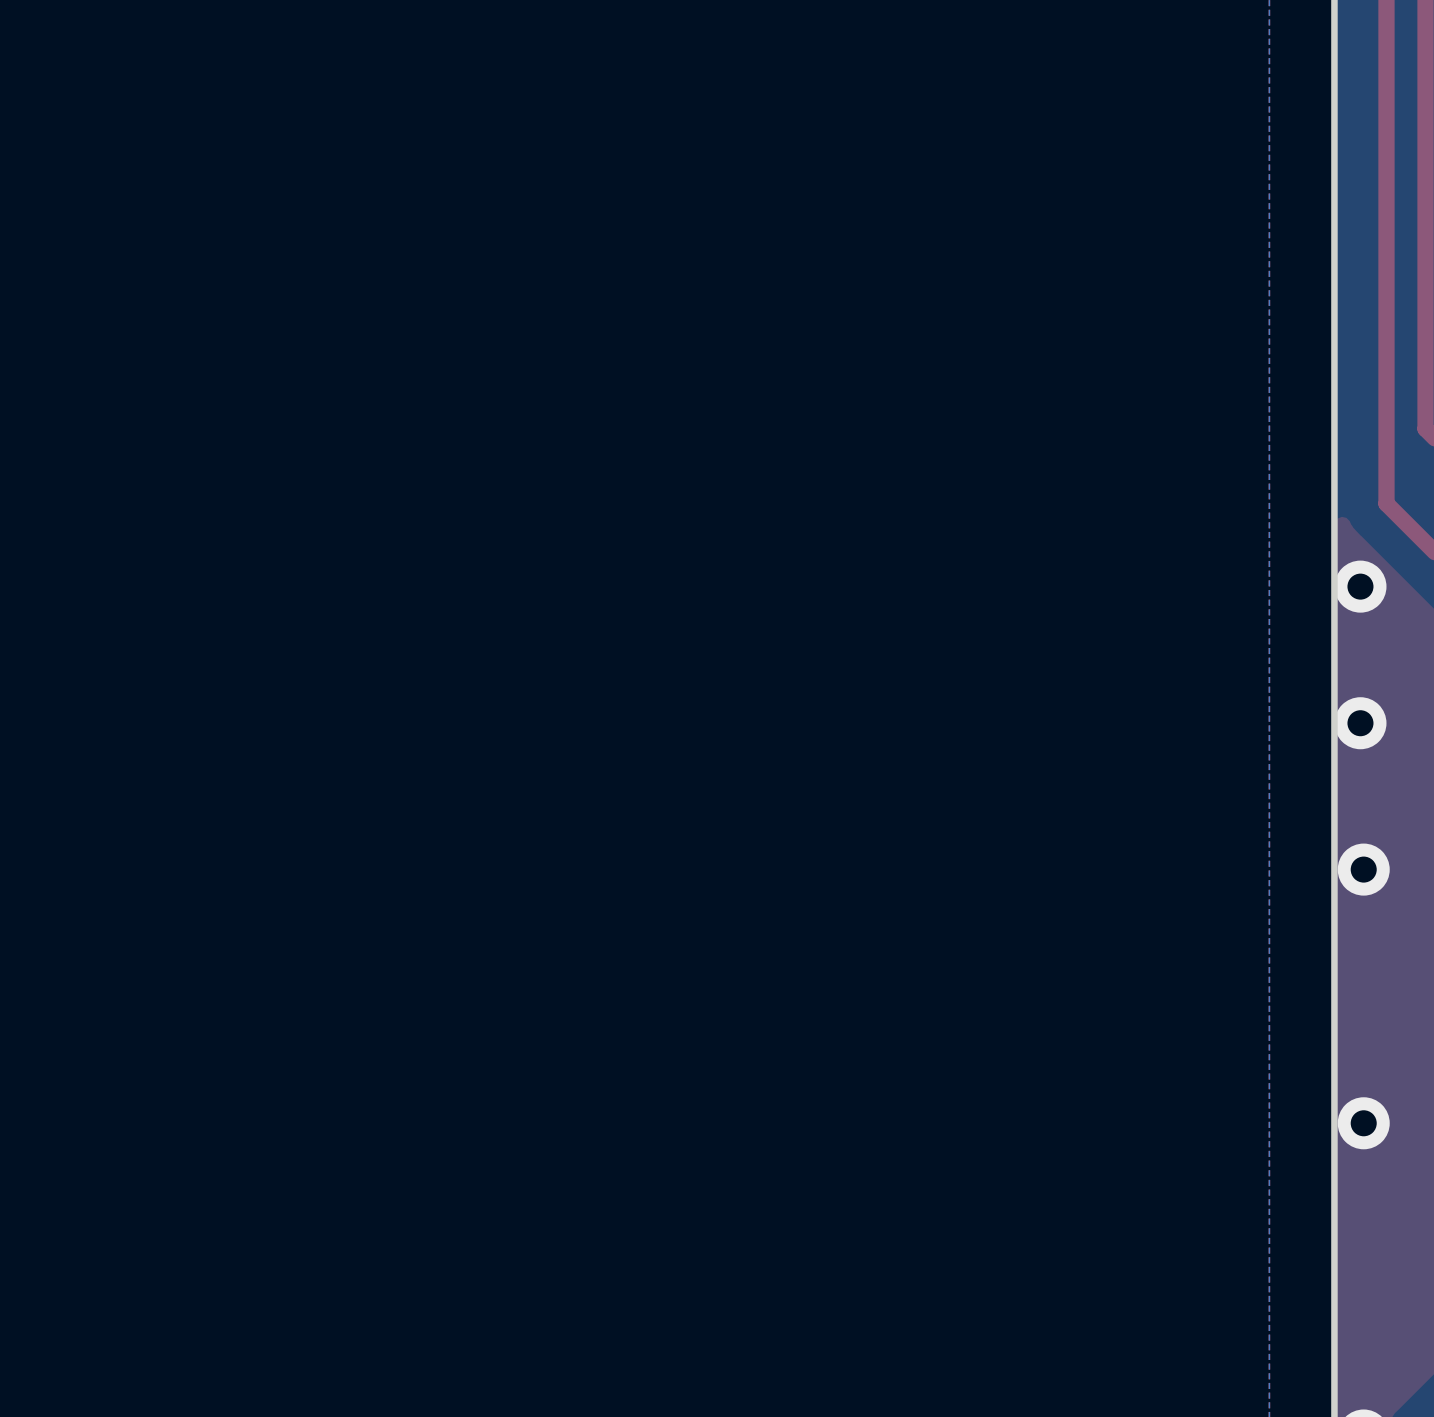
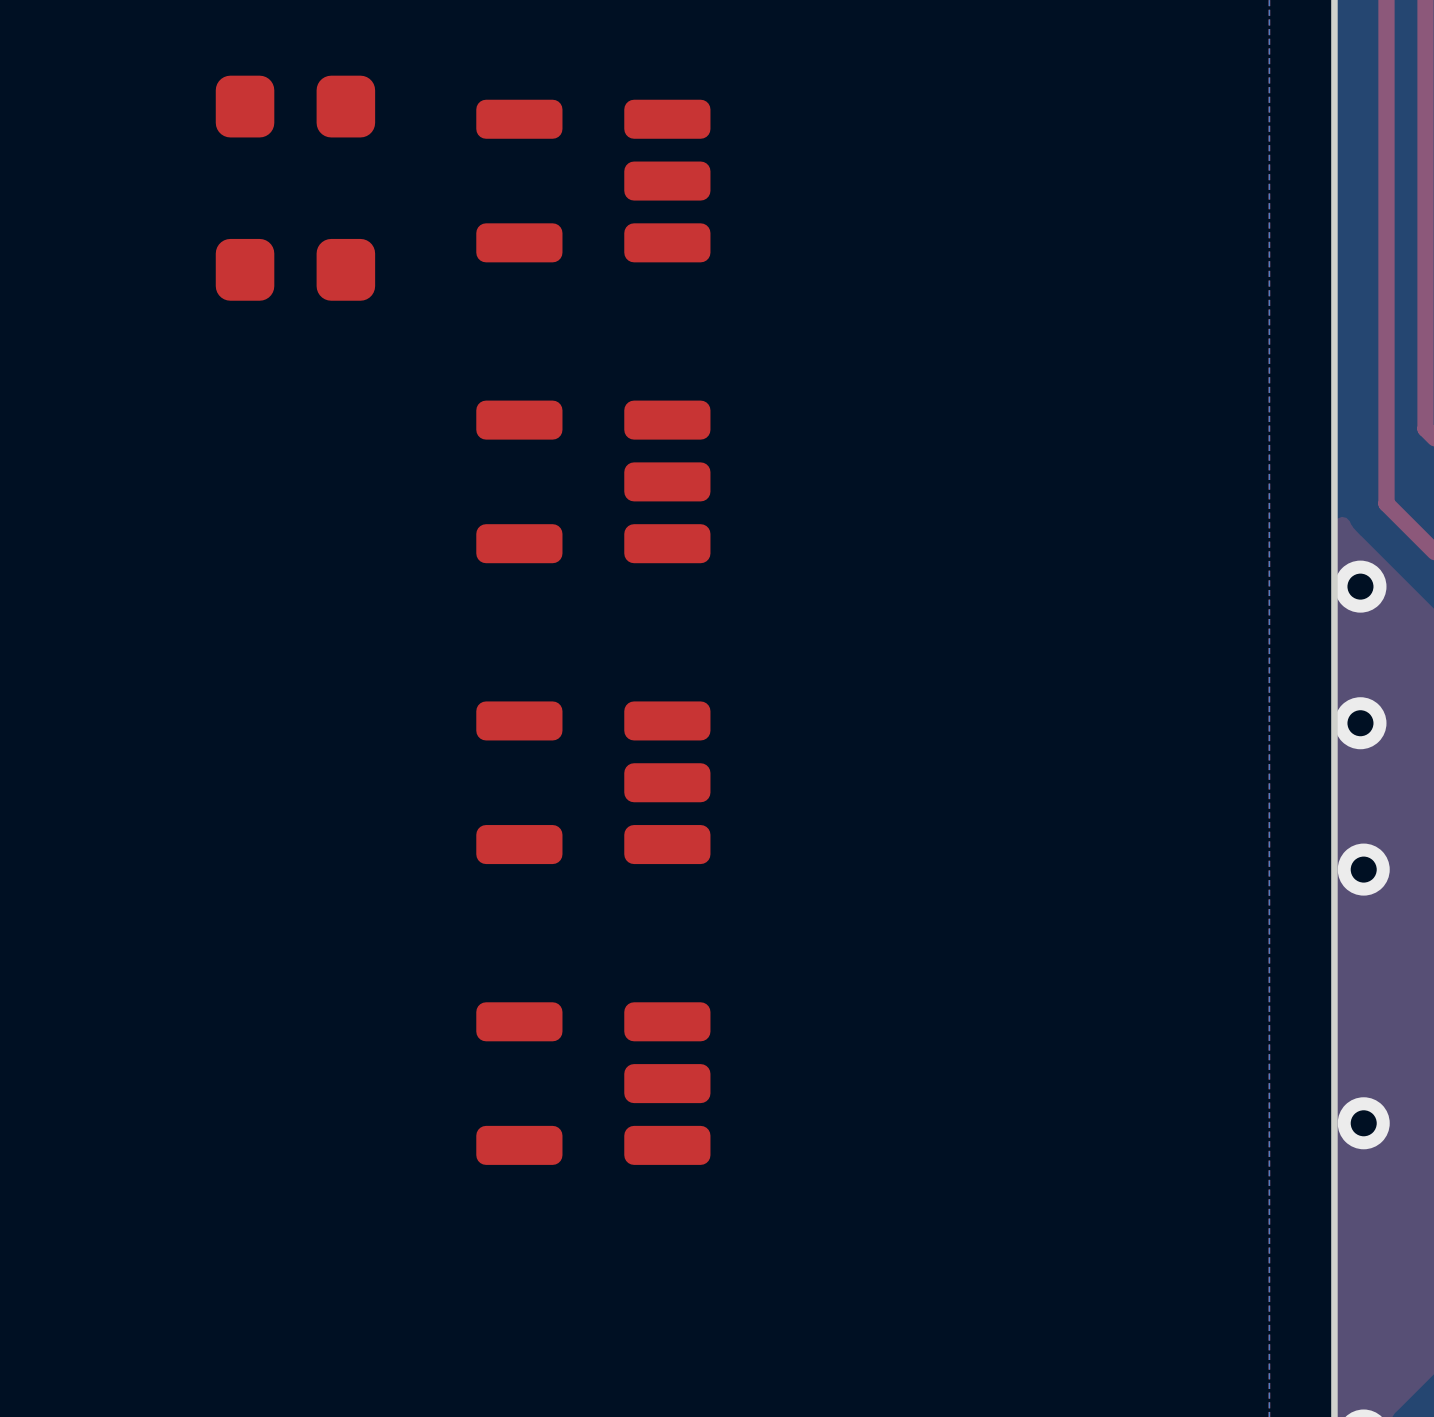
part: none -> (295, 106)
part: none -> (593, 181)
part: none -> (295, 269)
part: none -> (593, 481)
part: none -> (593, 782)
part: none -> (593, 1083)

